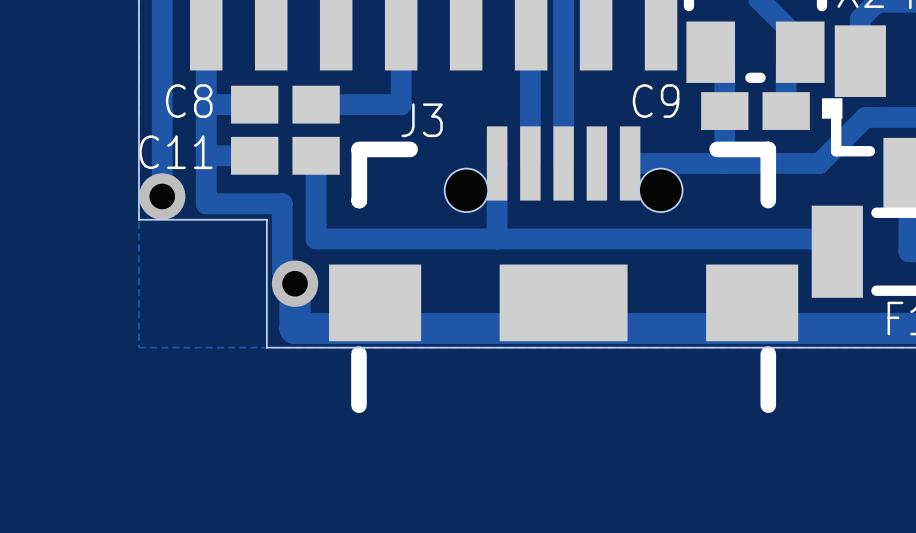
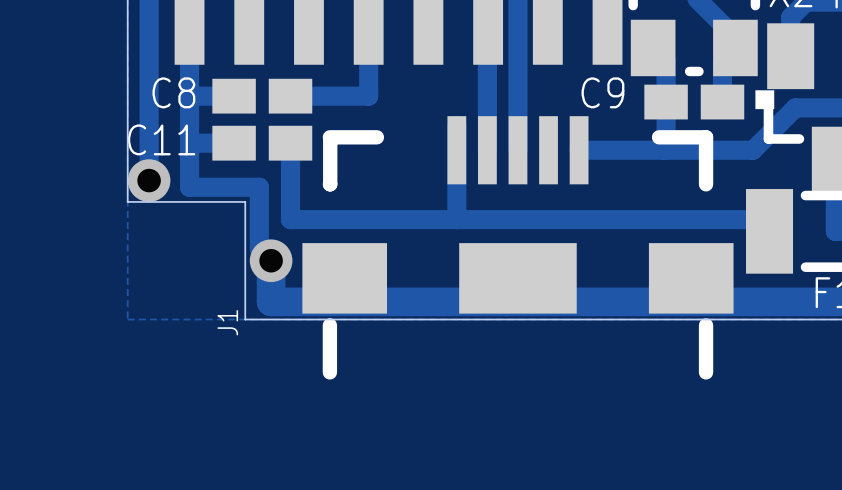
J3: (563, 269) -> none
J1: none -> (517, 247)

